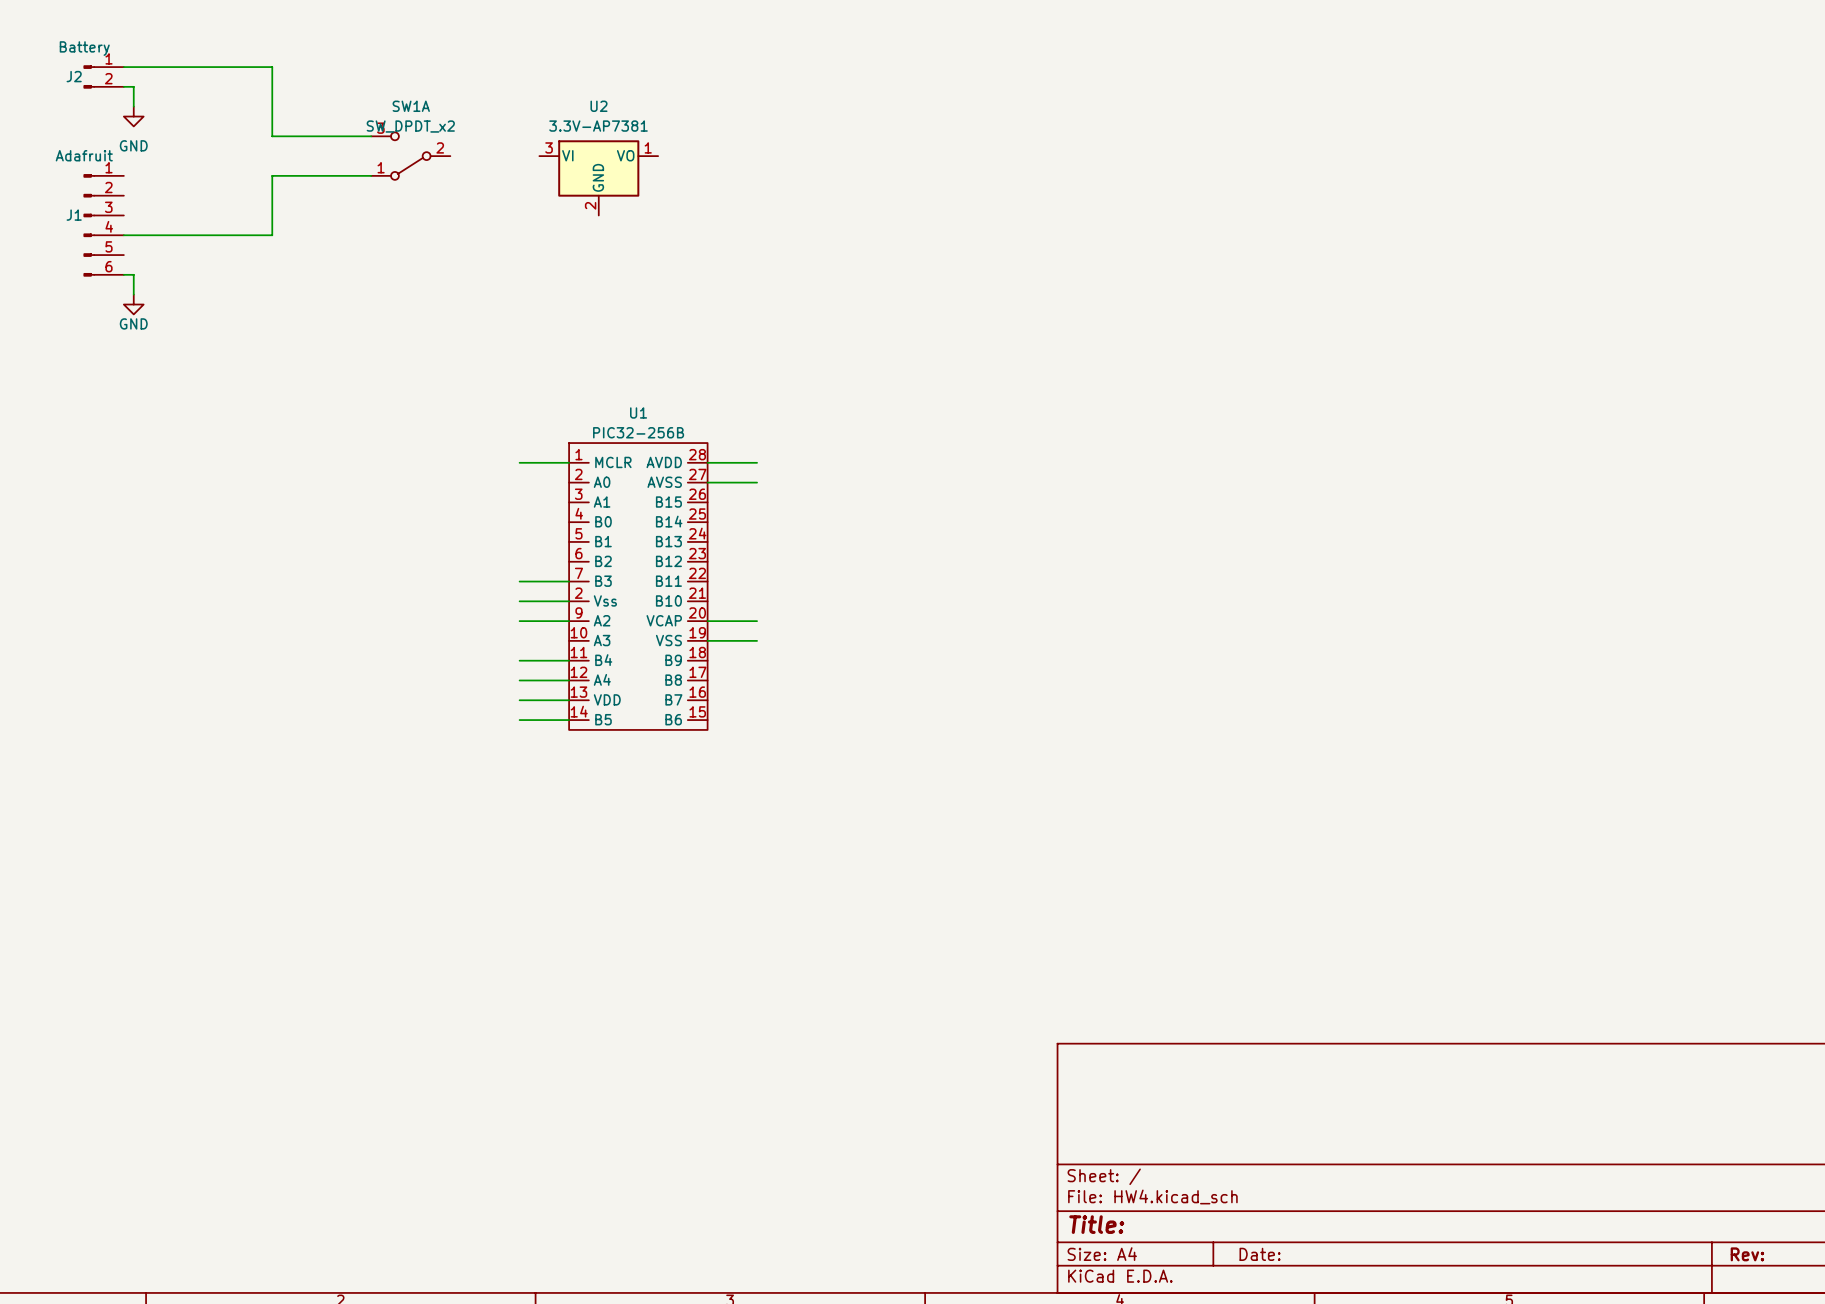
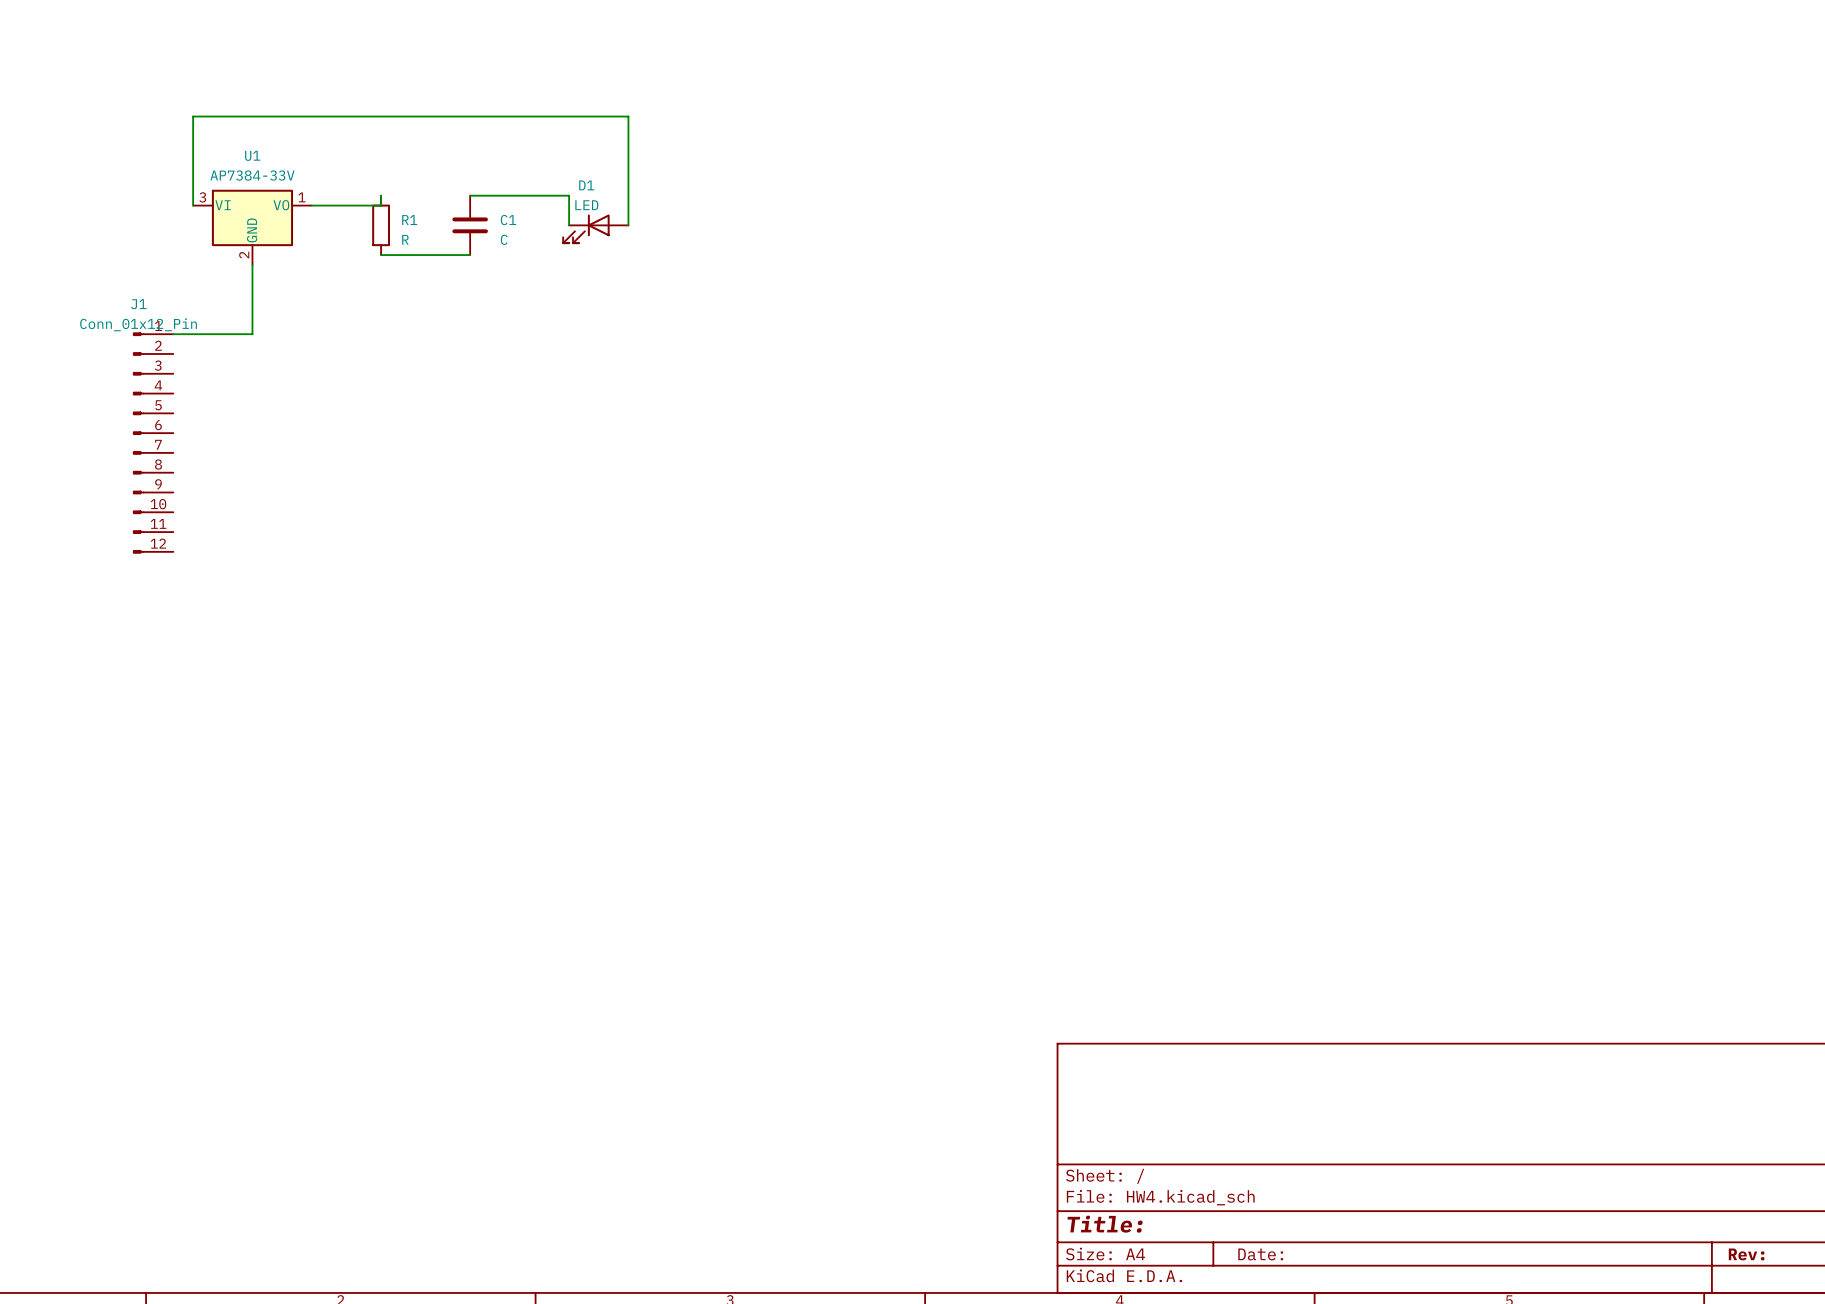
wire: (123, 67) (272, 67) (272, 136) (371, 136) -> none
J2: Battery (103, 76) -> none
wire: (123, 86) (133, 86) (133, 106) -> none
power symbol: GND (133, 116) -> none
J1 value: Adafruit (84, 155) -> Conn_01x12_Pin (138, 324)
SW1A: SW_DPDT_x2 (410, 156) -> none
J1 symbol: [83, 174, 124, 277] -> [133, 332, 174, 554]
wire: (371, 175) (272, 175) (272, 235) (123, 235) -> none
U2: 3.3V-AP7381 (598, 177) -> none
wire: none -> (381, 195) (381, 205) (311, 205)
wire: none -> (470, 195) (569, 195) (569, 225)
wire: none -> (193, 205) (193, 116) (628, 116) (628, 225)
J1 name position: J1 (74, 215) -> J1 (138, 304)
R1: none -> R (381, 225)
C1: none -> C (470, 225)
D1: none -> LED (595, 228)
wire: none -> (381, 255) (470, 255)
wire: none -> (252, 264) (252, 334) (173, 334)
wire: (123, 274) (133, 274) (133, 294) -> none
power symbol: GND (133, 304) -> none
U1 name position: U1 (638, 412) -> U1 (252, 155)
U1 value: PIC32-256B (638, 432) -> AP7384-33V (252, 175)
U1 symbol: [569, 443, 708, 730] -> [193, 189, 312, 265]
wire: (519, 462) (569, 462) -> none
wire: (707, 462) (757, 462) -> none
wire: (707, 482) (757, 482) -> none
wire: (519, 581) (569, 581) -> none
wire: (519, 601) (569, 601) -> none
wire: (519, 621) (569, 621) -> none
wire: (707, 621) (757, 621) -> none
wire: (707, 640) (757, 640) -> none
wire: (519, 660) (569, 660) -> none
wire: (519, 680) (569, 680) -> none
wire: (519, 700) (569, 700) -> none
wire: (519, 720) (569, 720) -> none

